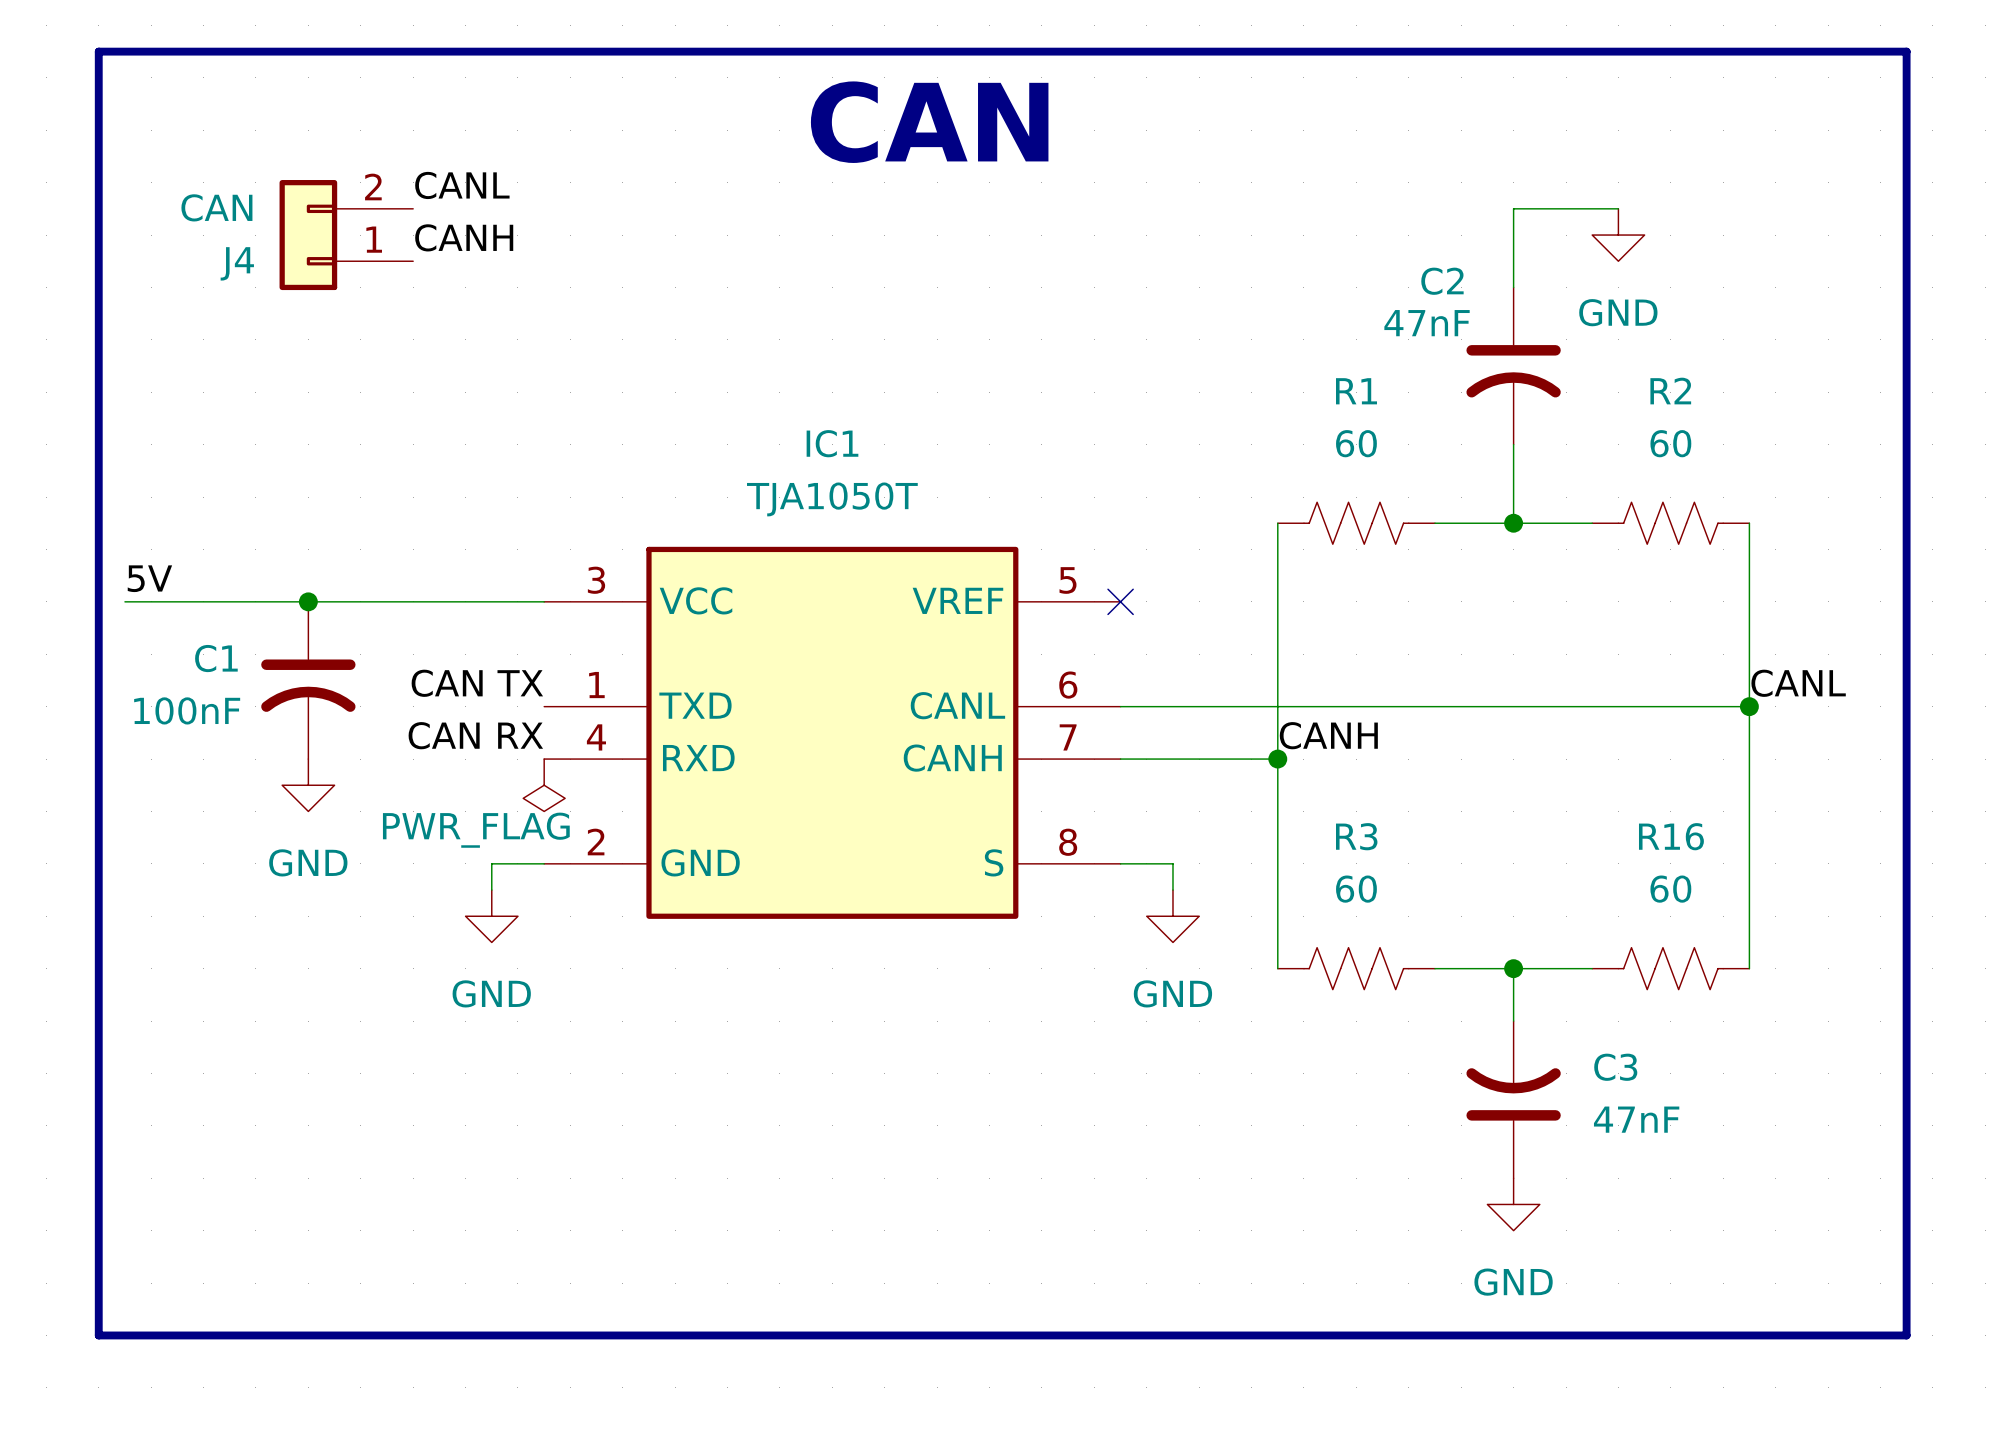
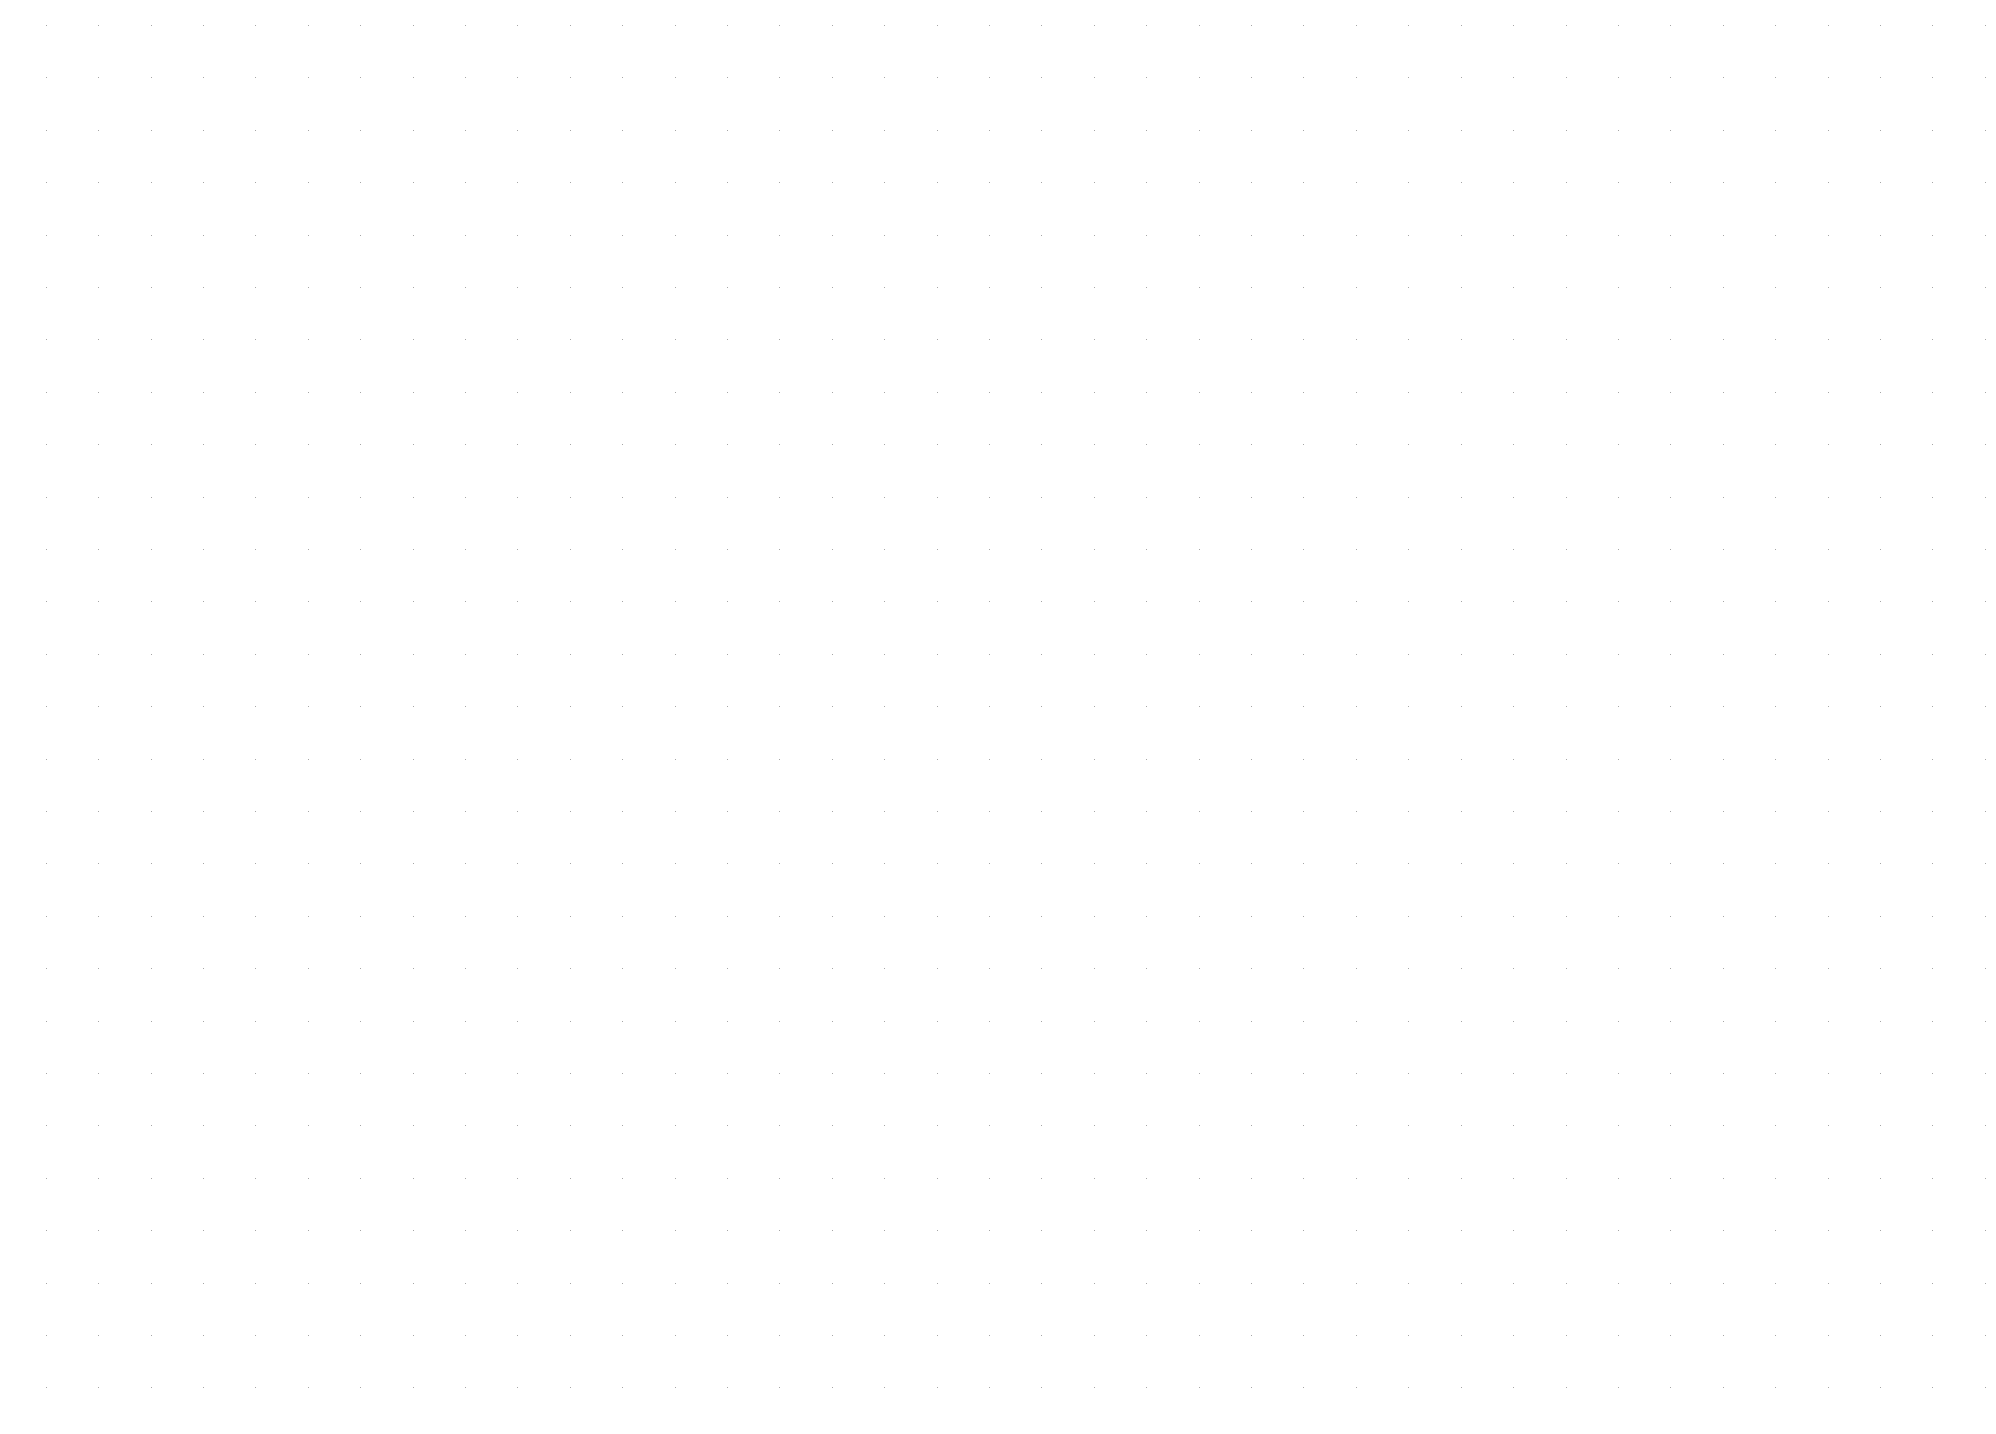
line: (98, 51) (1906, 51) (1906, 1335) (98, 1335) (98, 51) -> none
text: CAN (929, 122) -> none
label: CANL (462, 185) -> none
wire: (1618, 208) (1513, 208) (1513, 287) -> none
J4: CAN (346, 235) -> none
power symbol: GND (1618, 235) -> none
label: CANH (464, 237) -> none
C2: 47nF (1513, 366) -> none
wire: (1513, 444) (1513, 523) -> none
wire: (1277, 523) (1277, 968) -> none
R1: 60 (1356, 523) -> none
wire: (1435, 523) (1592, 523) -> none
junction: (1513, 523) -> none
R2: 60 (1670, 523) -> none
wire: (1749, 523) (1749, 968) -> none
label: 5V (149, 578) -> none
wire: (124, 601) (544, 601) -> none
junction: (308, 601) -> none
no-connect mark: (1120, 601) -> none
C1: 100nF (308, 680) -> none
label: CAN TX (477, 683) -> none
label: CANL (1798, 683) -> none
wire: (1120, 706) (1749, 706) -> none
junction: (1749, 706) -> none
IC1: TJA1050T (832, 732) -> none
label: CAN RX (475, 735) -> none
label: CANH (1328, 735) -> none
wire: (1120, 759) (1277, 759) -> none
junction: (1277, 759) -> none
power symbol: GND (308, 785) -> none
power symbol: PWR_FLAG (544, 785) -> none
wire: (544, 863) (491, 863) (491, 890) -> none
wire: (1120, 863) (1172, 863) (1172, 890) -> none
power symbol: GND (491, 916) -> none
power symbol: GND (1172, 916) -> none
R3: 60 (1356, 968) -> none
wire: (1435, 968) (1592, 968) -> none
wire: (1513, 968) (1513, 1021) -> none
junction: (1513, 968) -> none
R16: 60 (1670, 968) -> none
C3: 47nF (1513, 1099) -> none
power symbol: GND (1513, 1204) -> none

